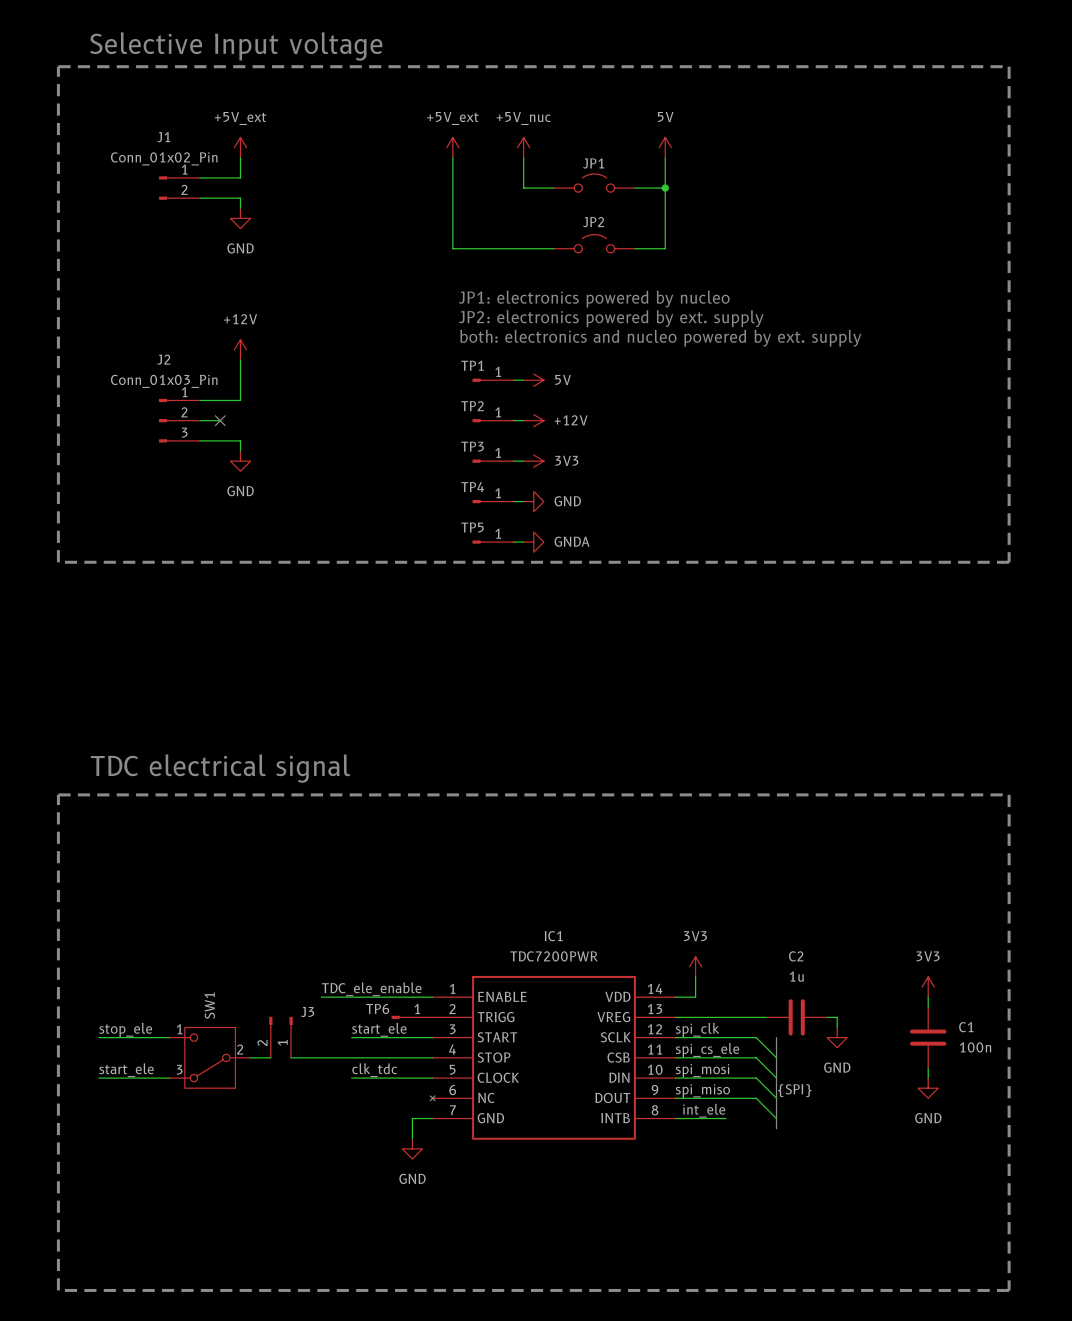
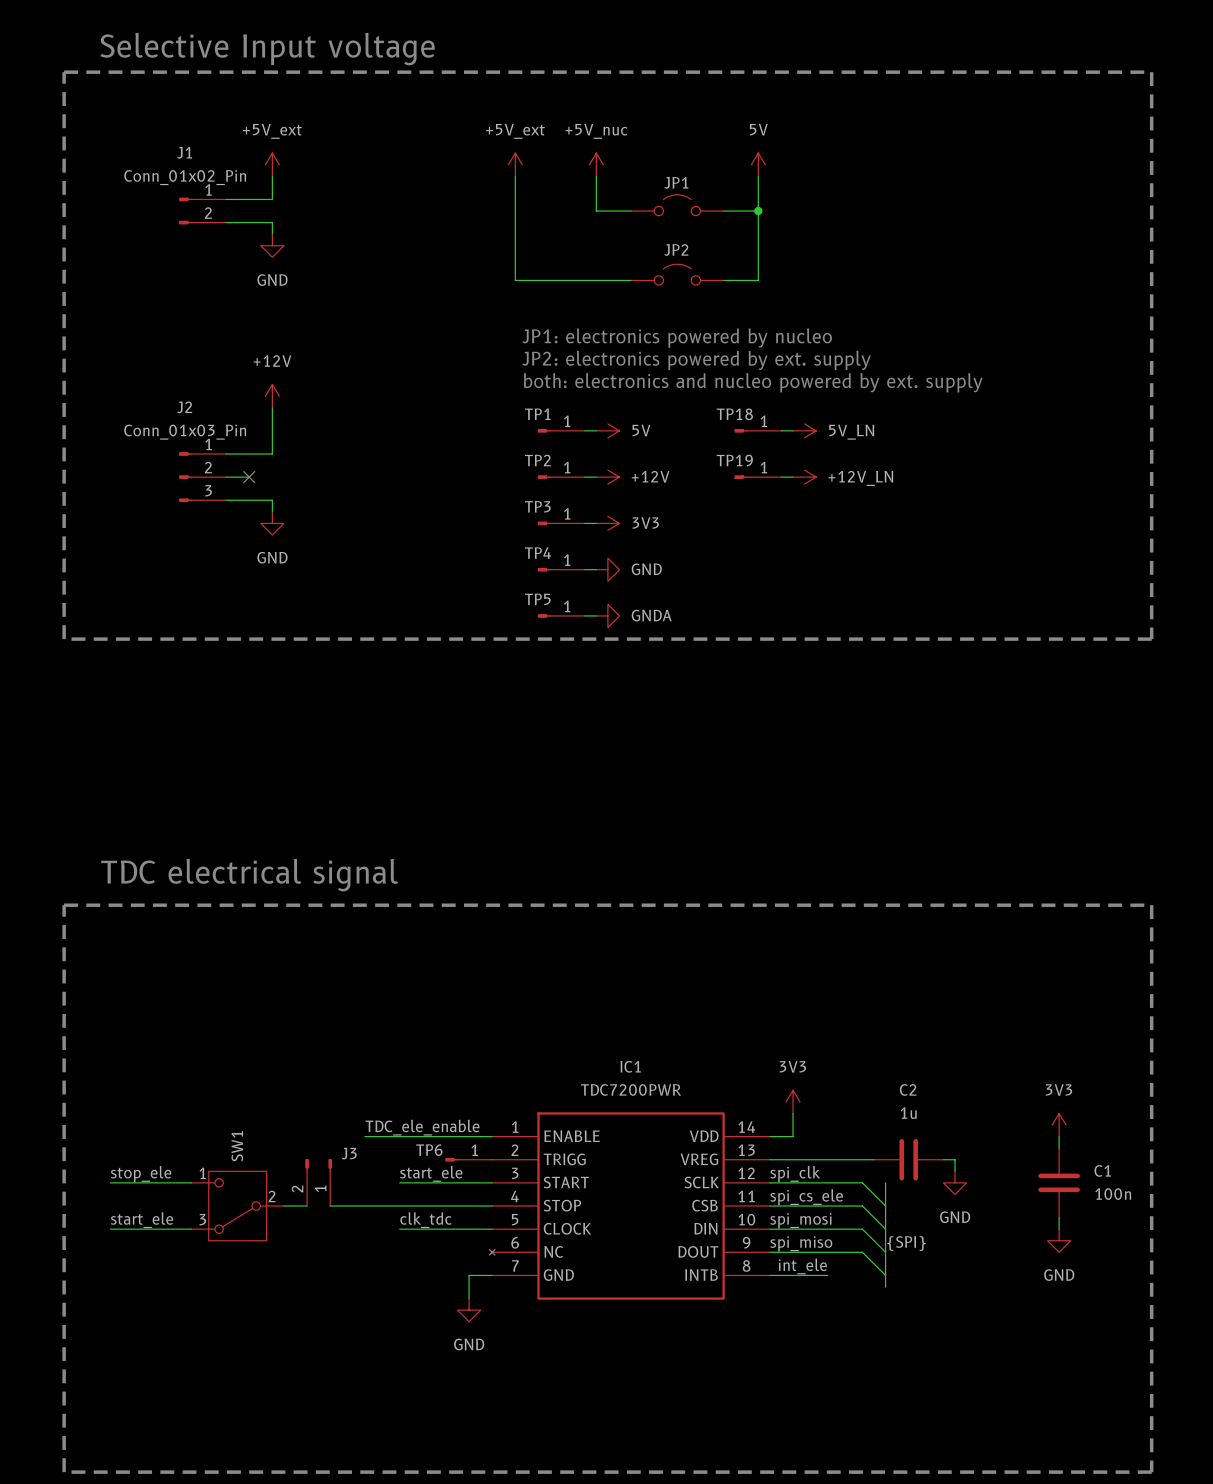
TP18: none -> (757, 430)
wire: none -> (781, 430) (793, 430)
power symbol: none -> 5V_LN (804, 430)
TP19: none -> (757, 477)
wire: none -> (781, 477) (793, 477)
power symbol: none -> +12V_LN (804, 477)

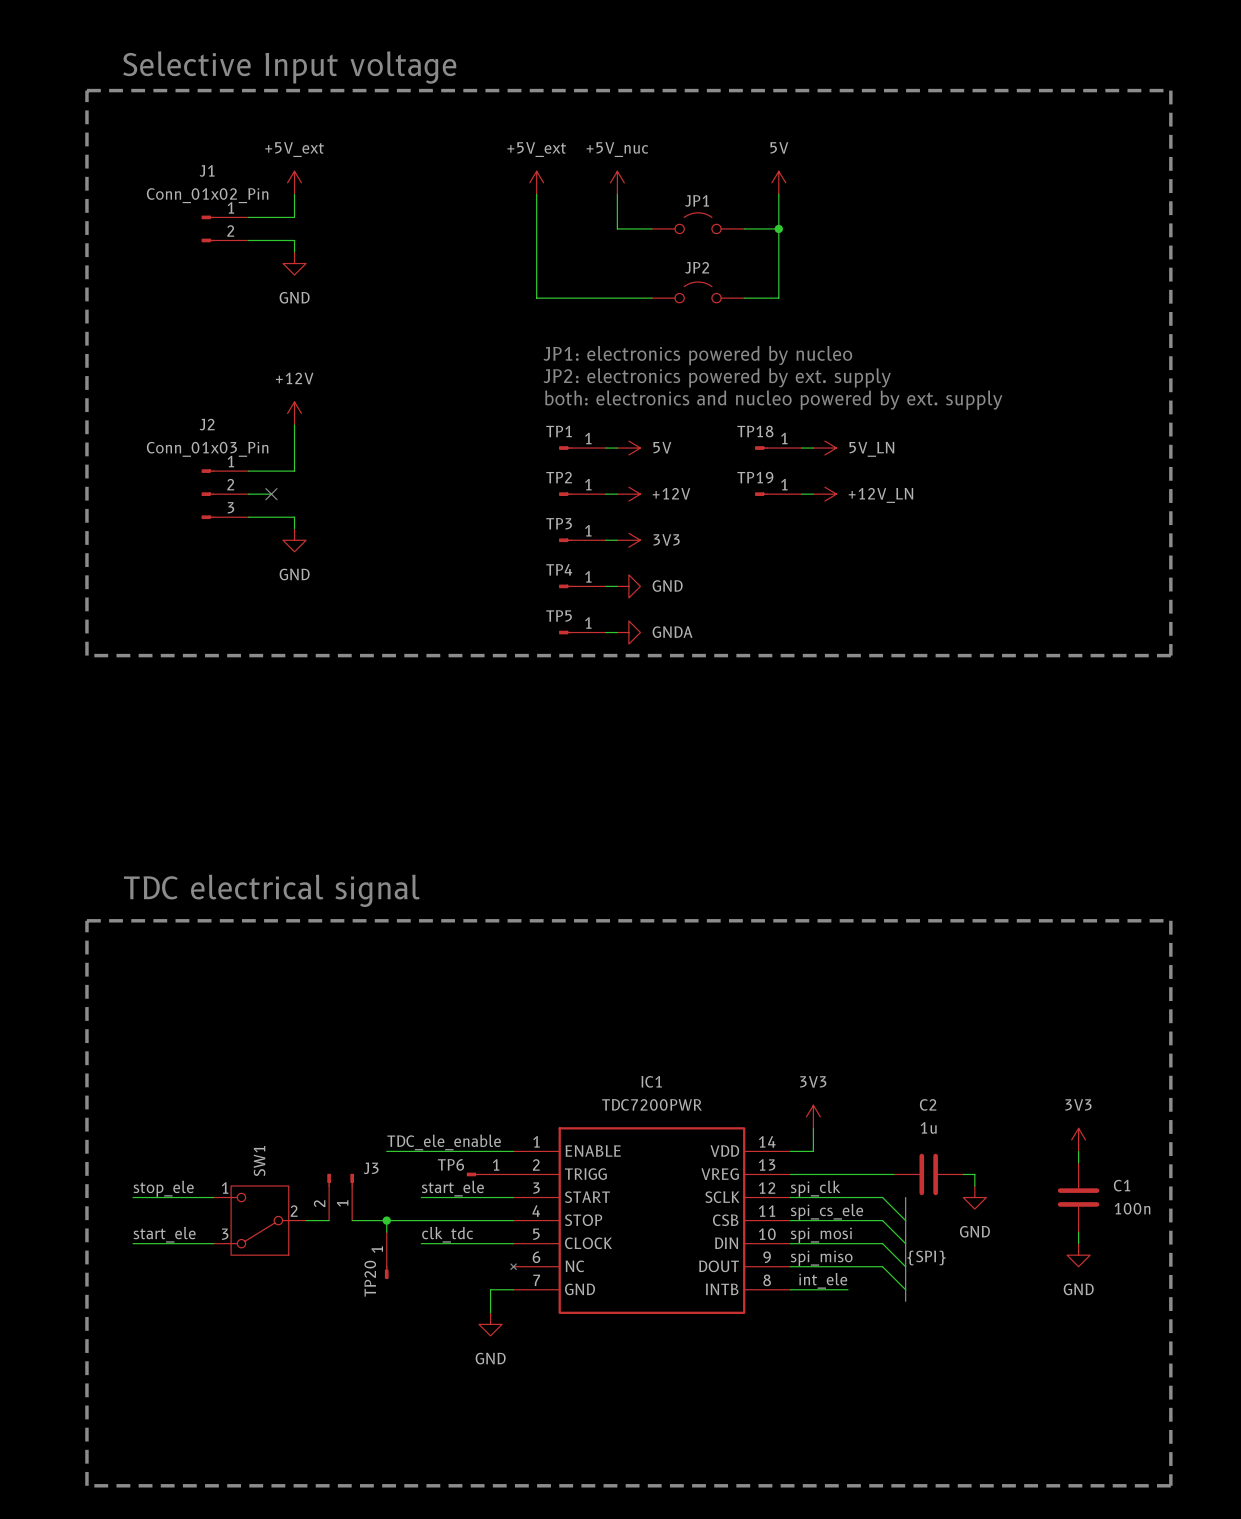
wire: none -> (386, 1220) (386, 1232)
junction: none -> (386, 1220)
TP20: none -> (386, 1255)

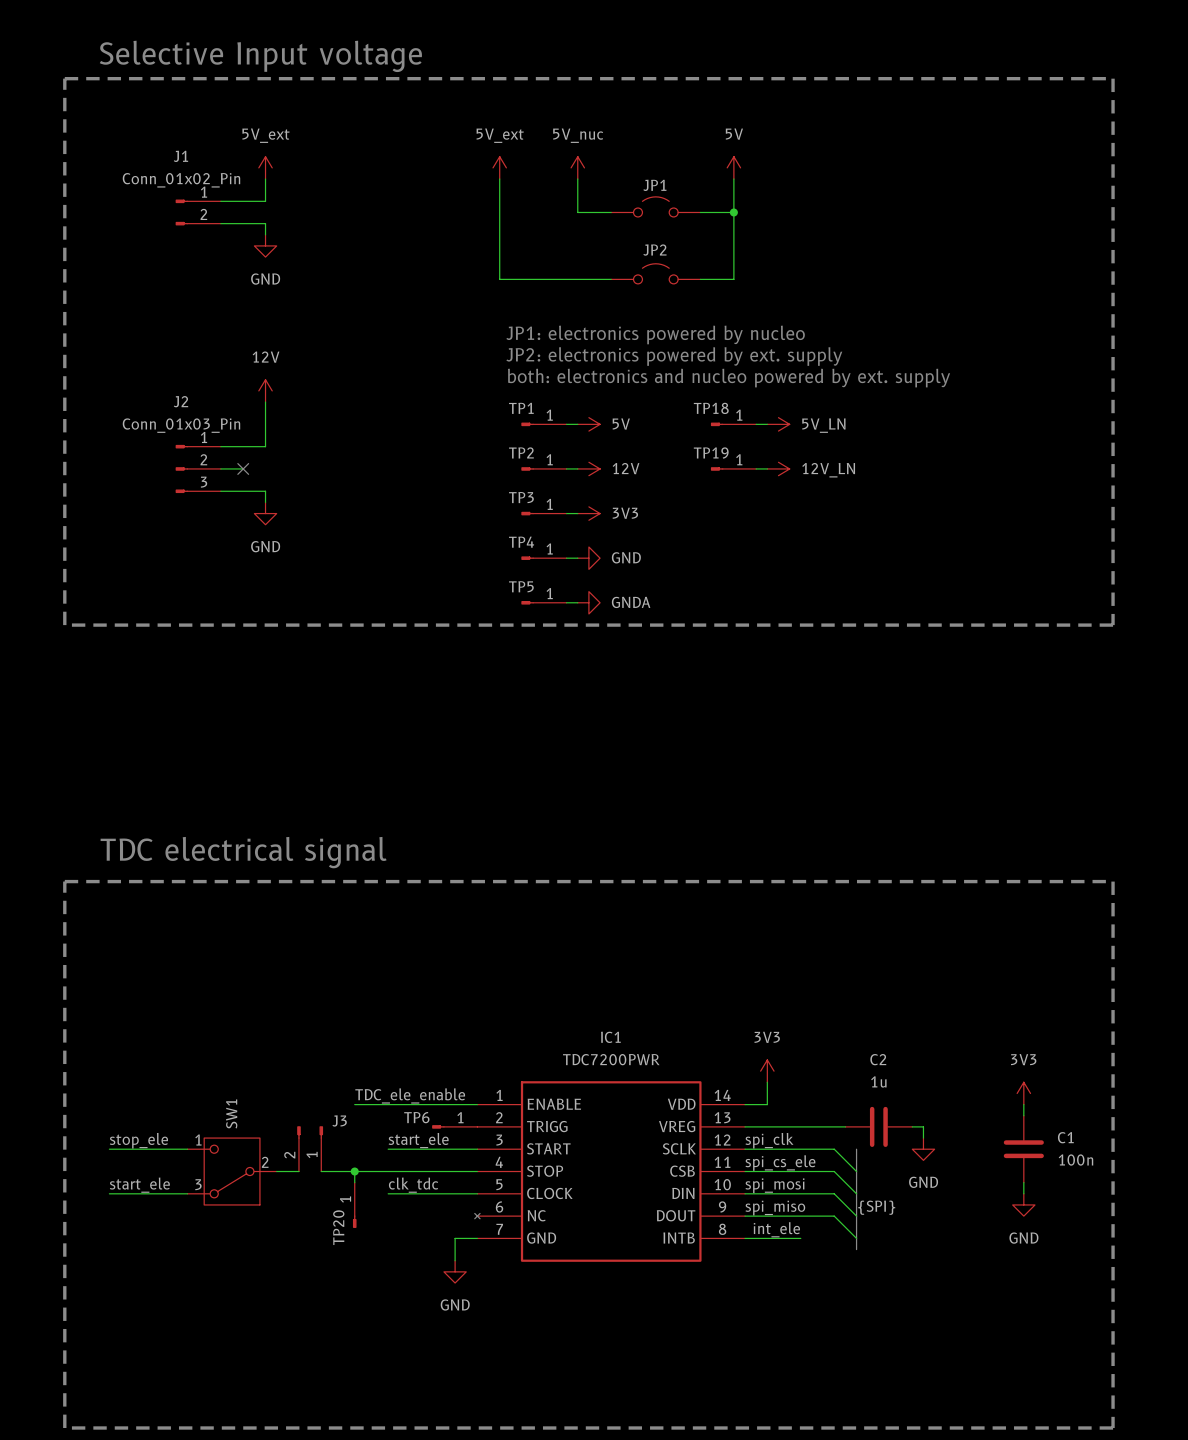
power symbol: +5V_ext (294, 182) -> 5V_ext (265, 167)
power symbol: +5V_ext (536, 182) -> 5V_ext (499, 167)
power symbol: +5V_nuc (617, 182) -> 5V_nuc (577, 167)
power symbol: +12V (294, 413) -> 12V (265, 390)
power symbol: +12V (628, 494) -> 12V (588, 468)
power symbol: +12V_LN (824, 494) -> 12V_LN (778, 468)

